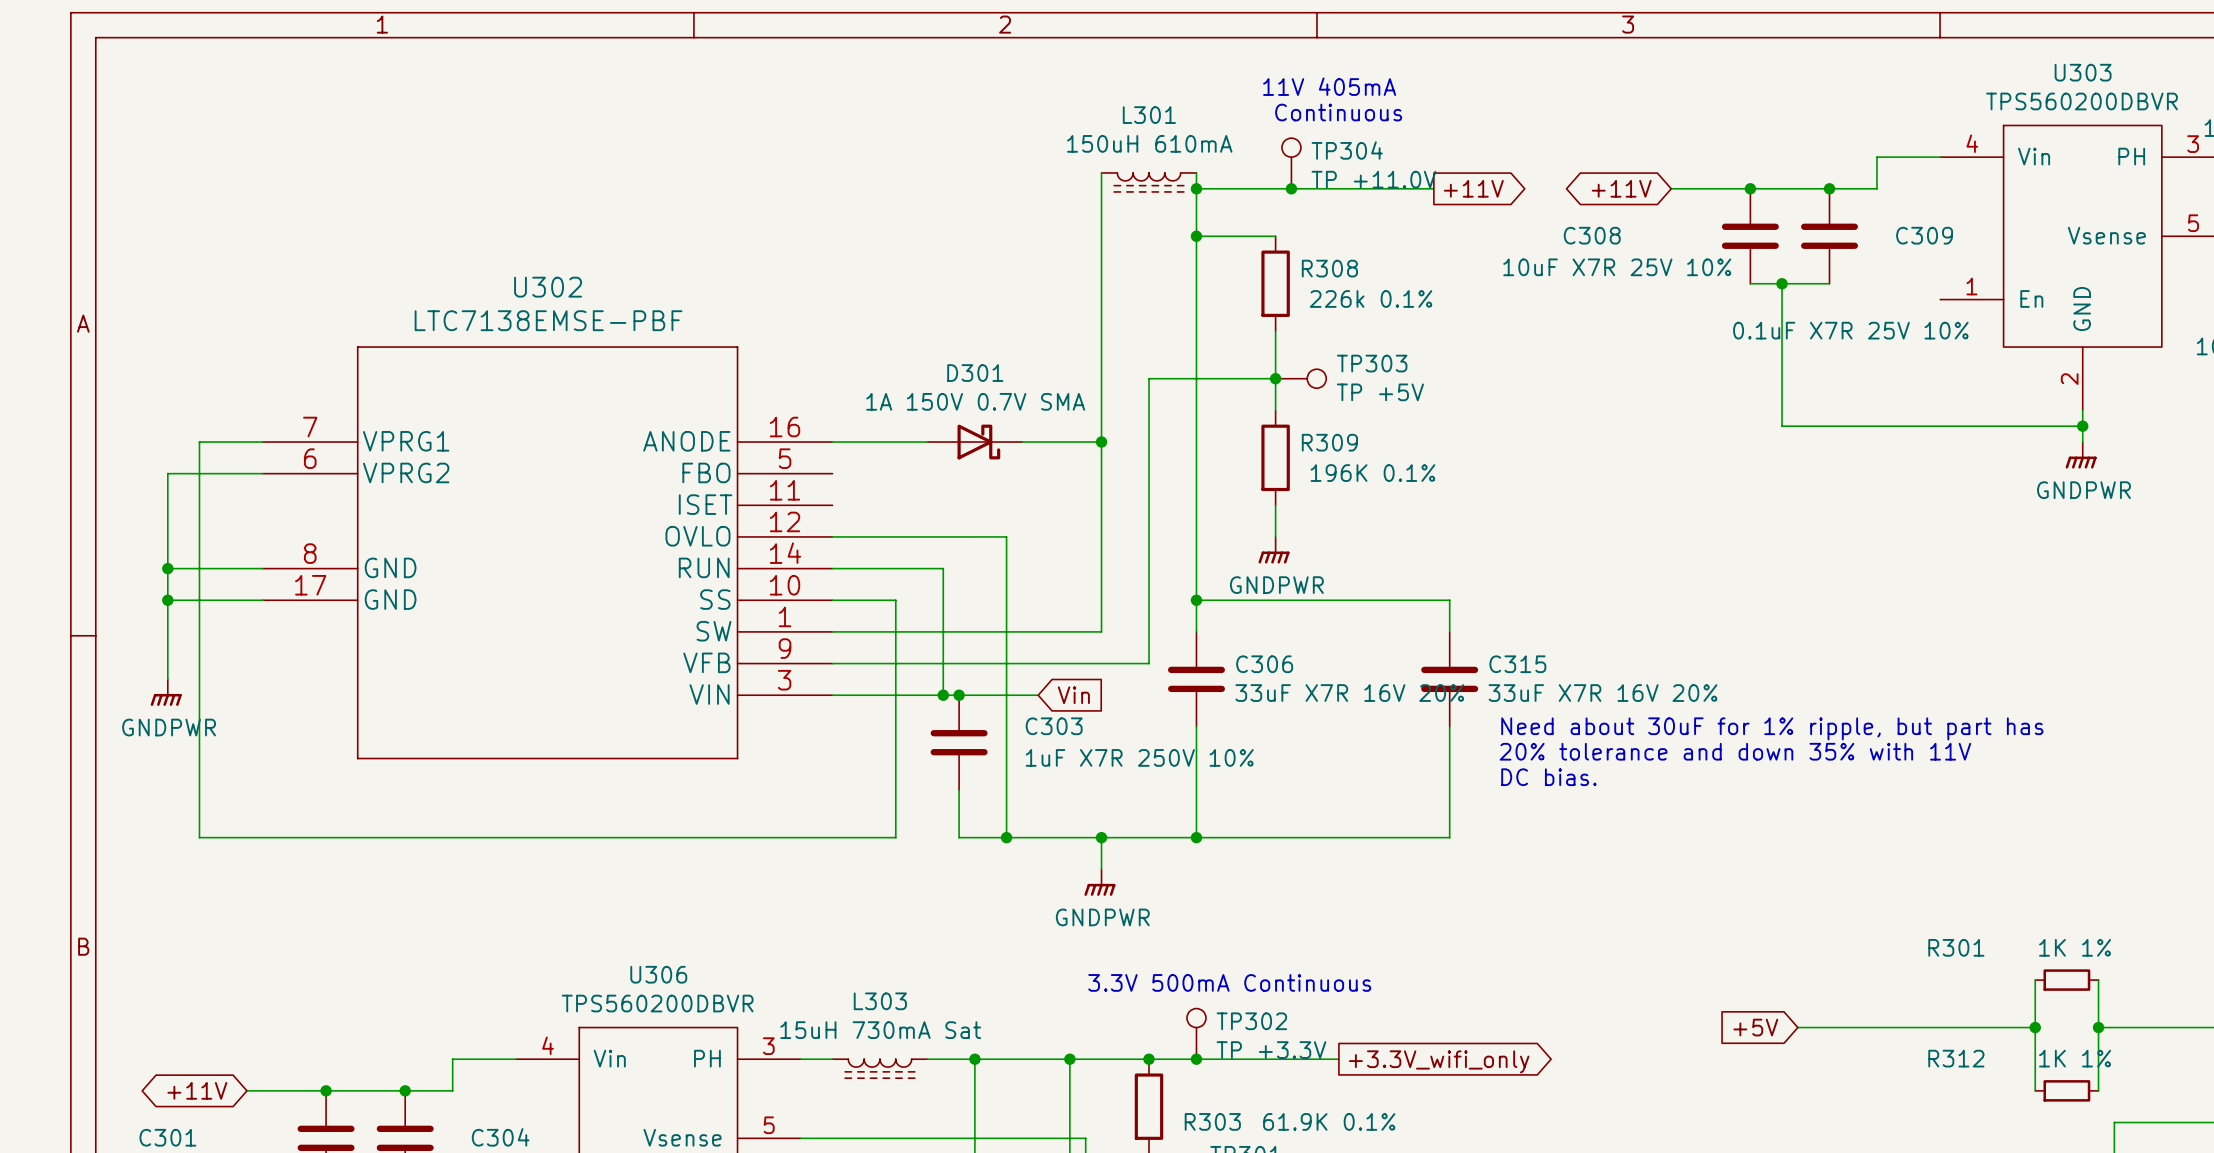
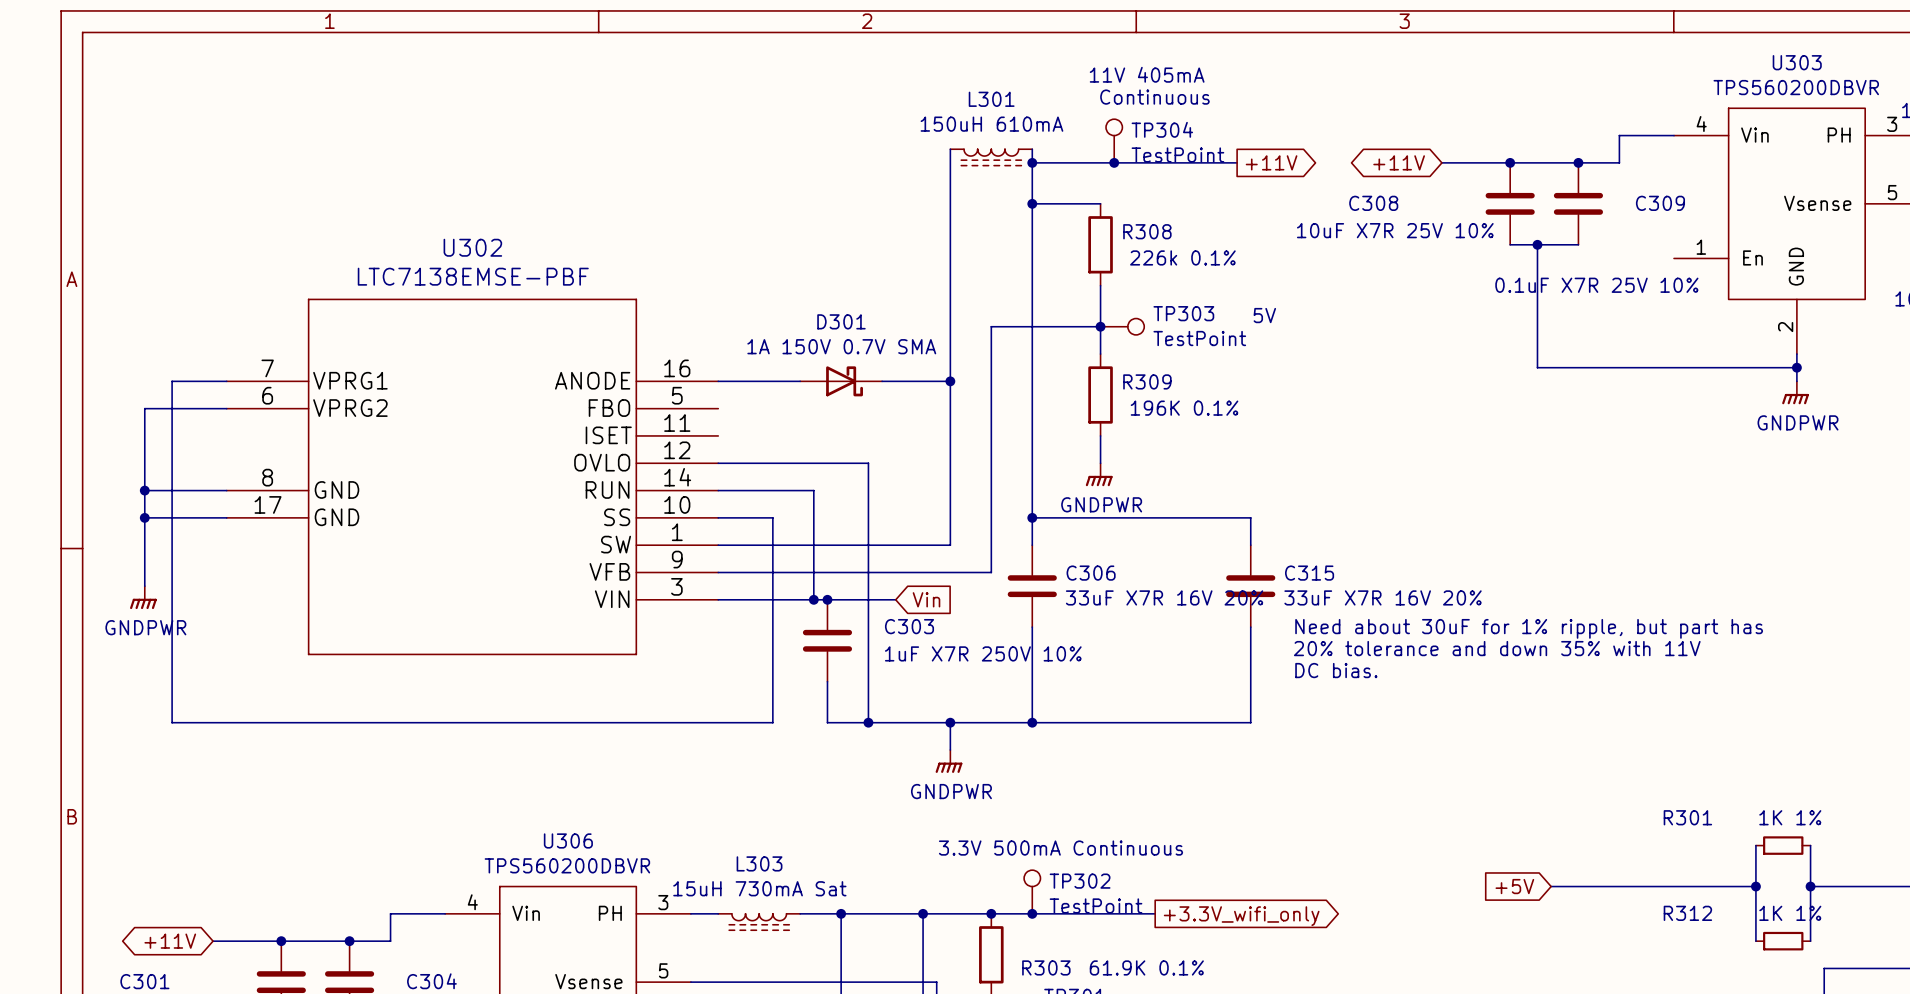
TP304 value: TP +11.0V (1373, 179) -> TestPoint (1177, 155)
text: none -> 5V (1264, 315)
TP303 value: TP +5V (1380, 392) -> TestPoint (1199, 338)
TP302 value: TP +3.3V (1271, 1050) -> TestPoint (1096, 905)

